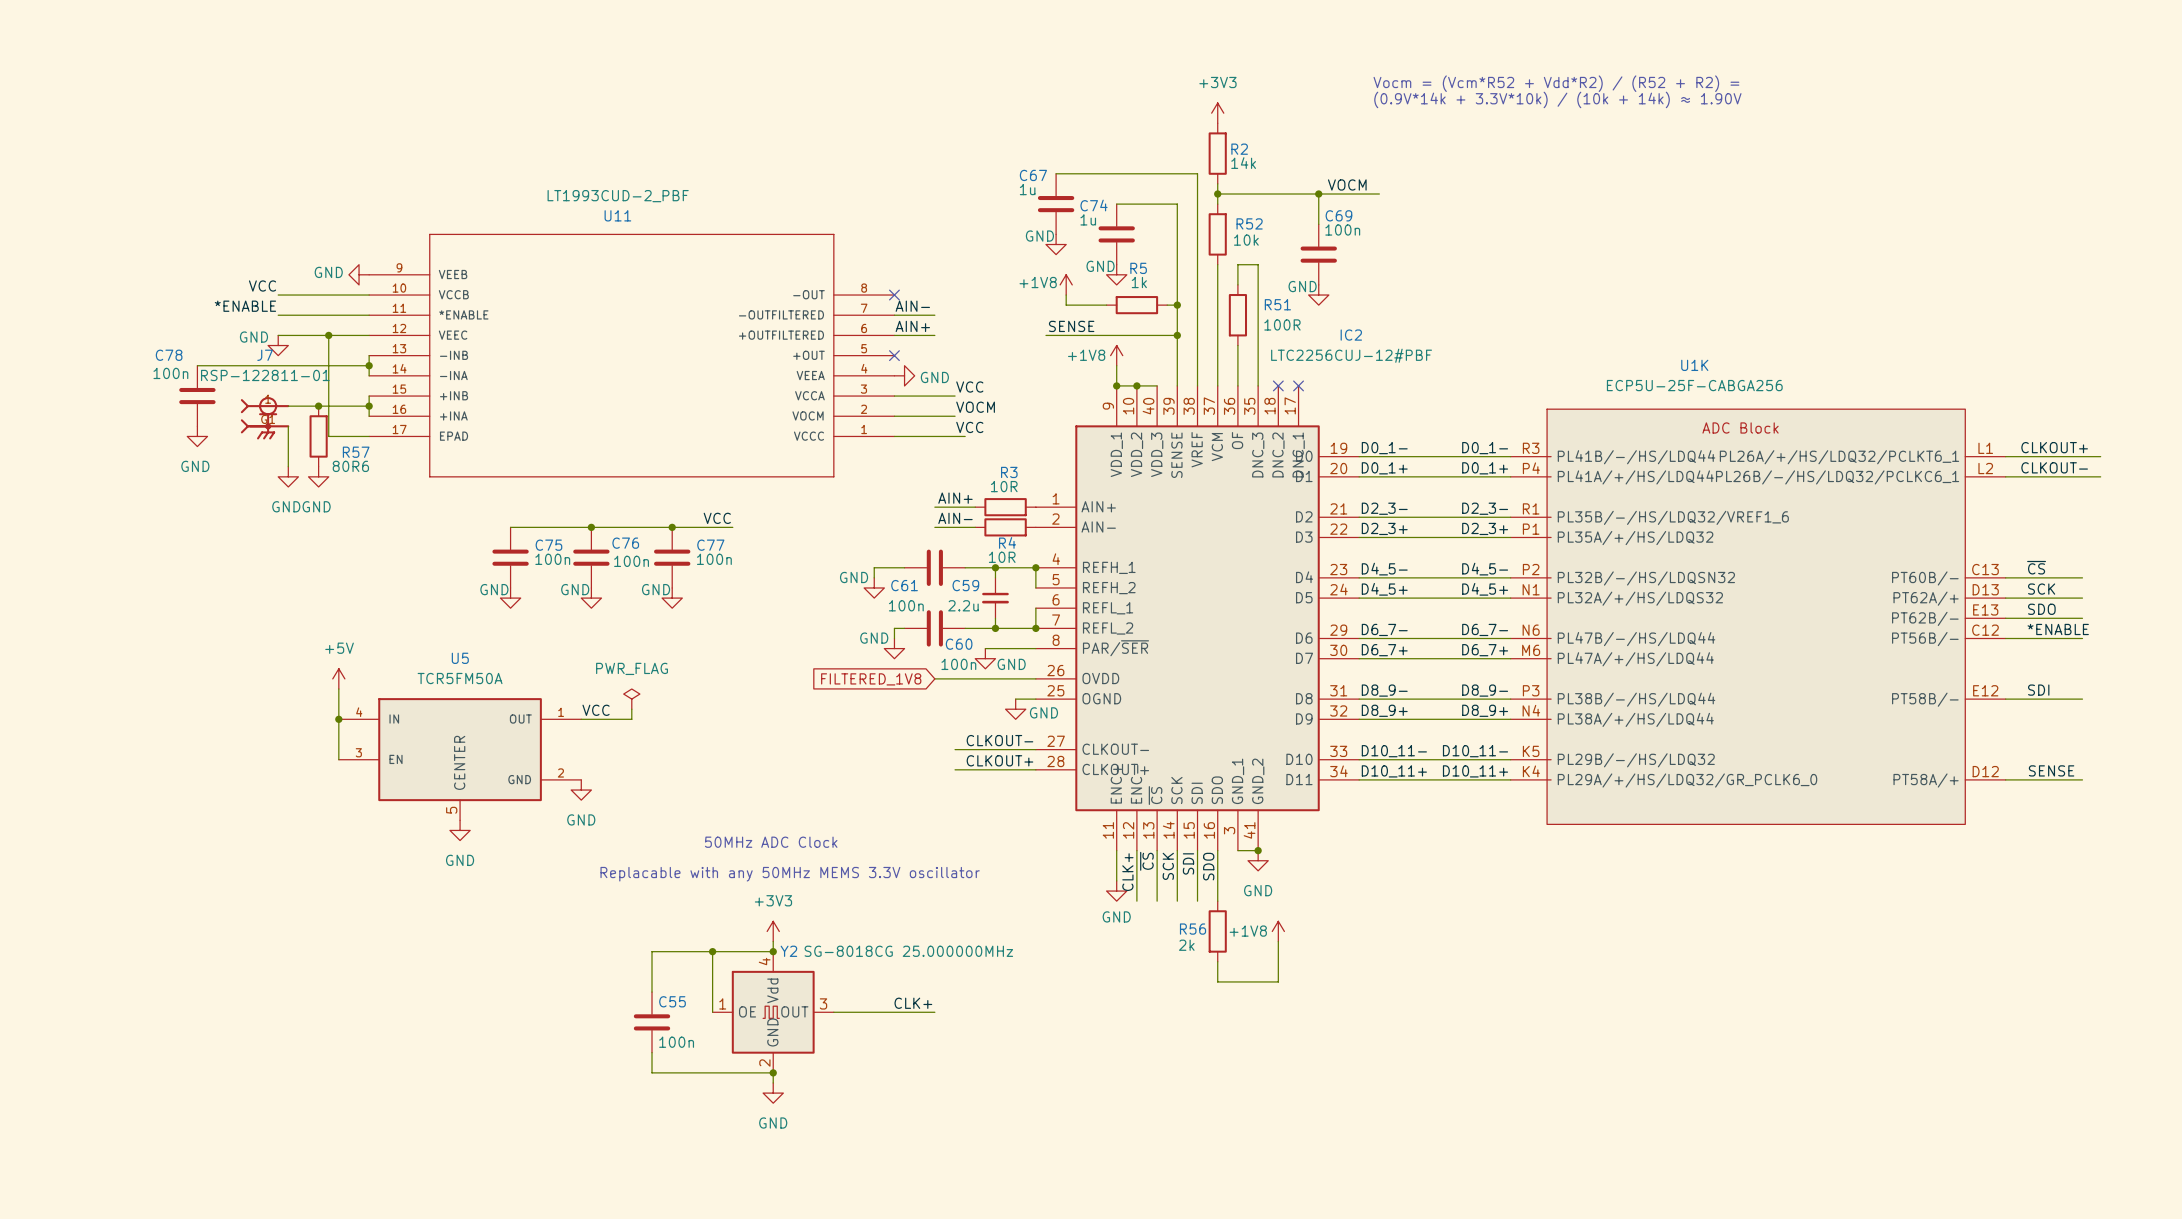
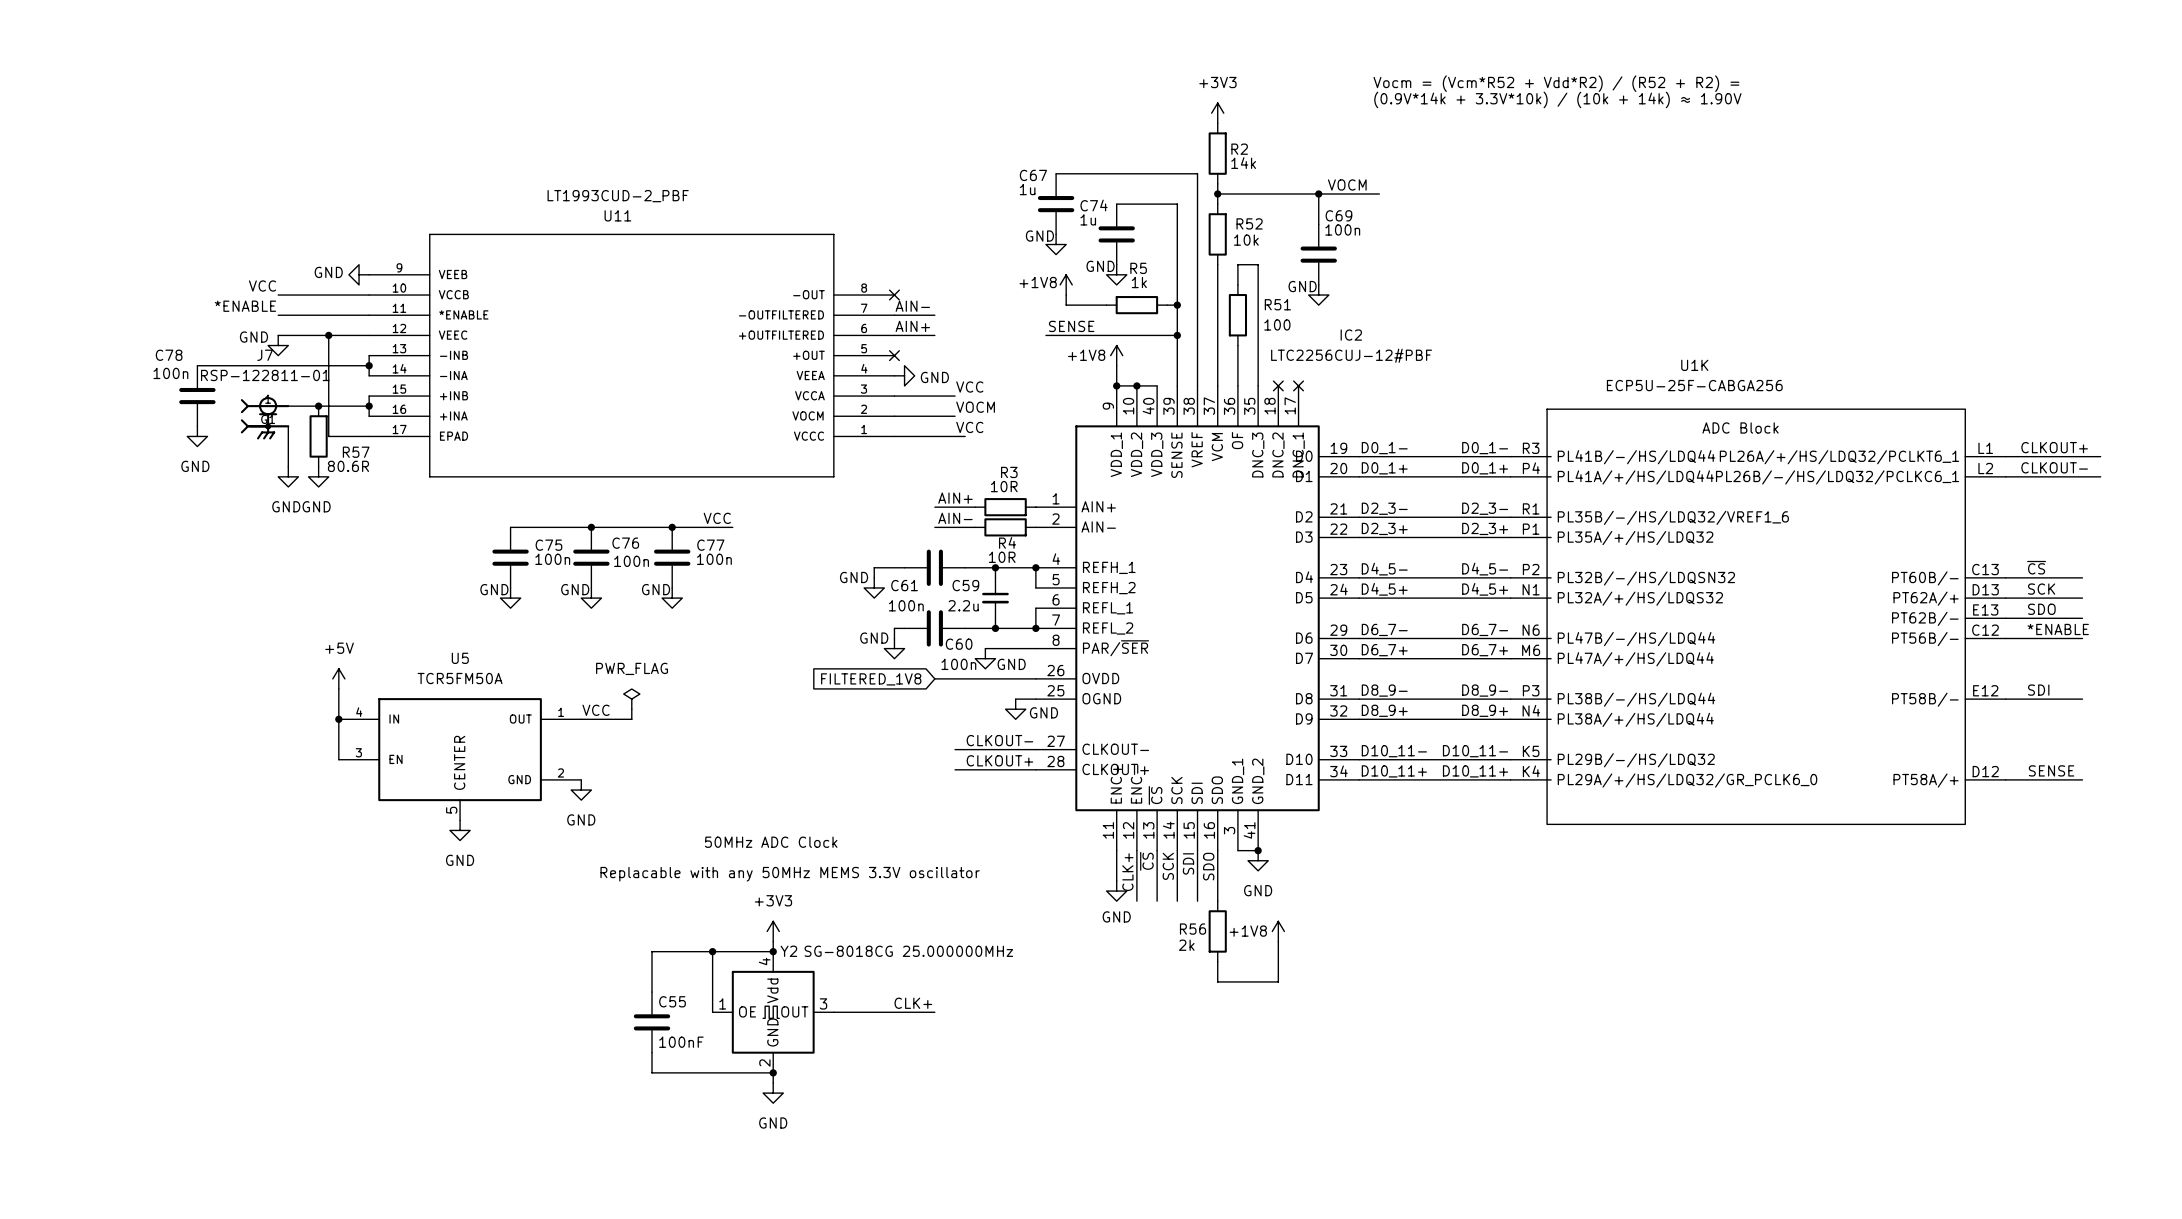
R51 value: 100R (1282, 324) -> 100 (1277, 324)
R57 value: 80R6 (350, 466) -> 80.6R (348, 466)
C55 value: 100n (676, 1042) -> 100nF (681, 1042)

